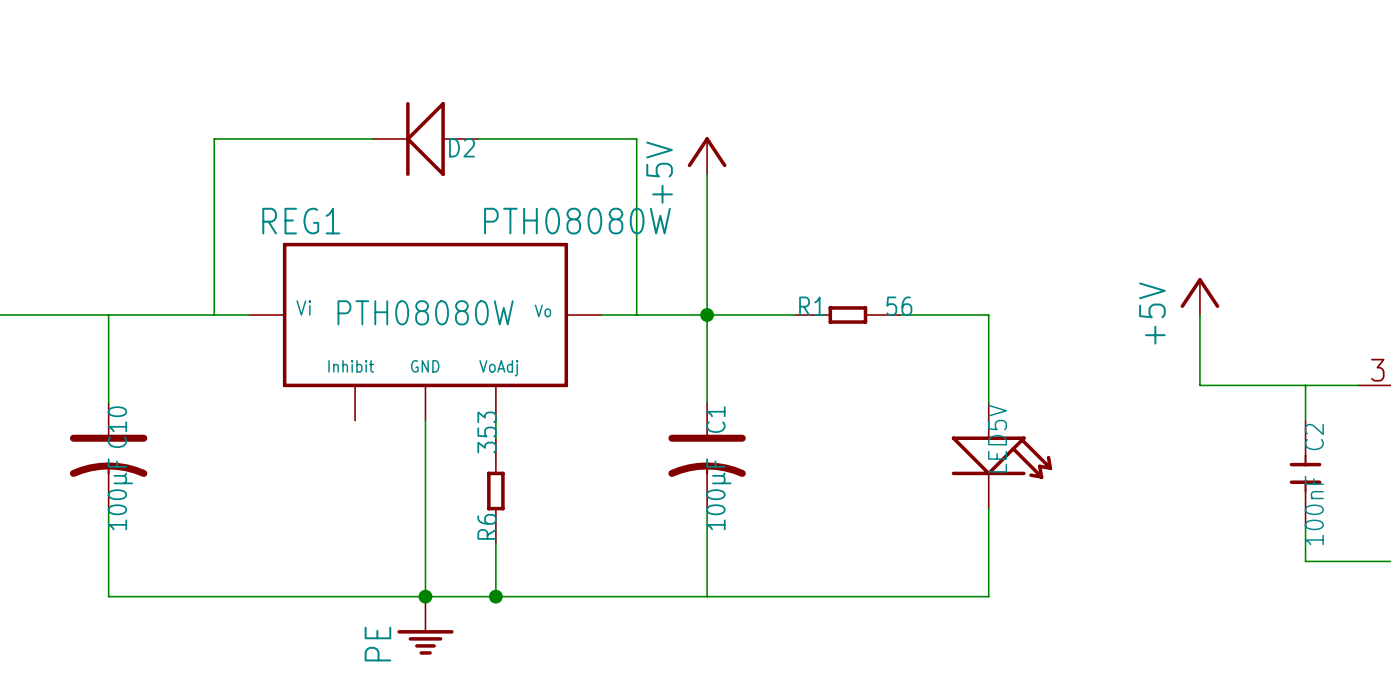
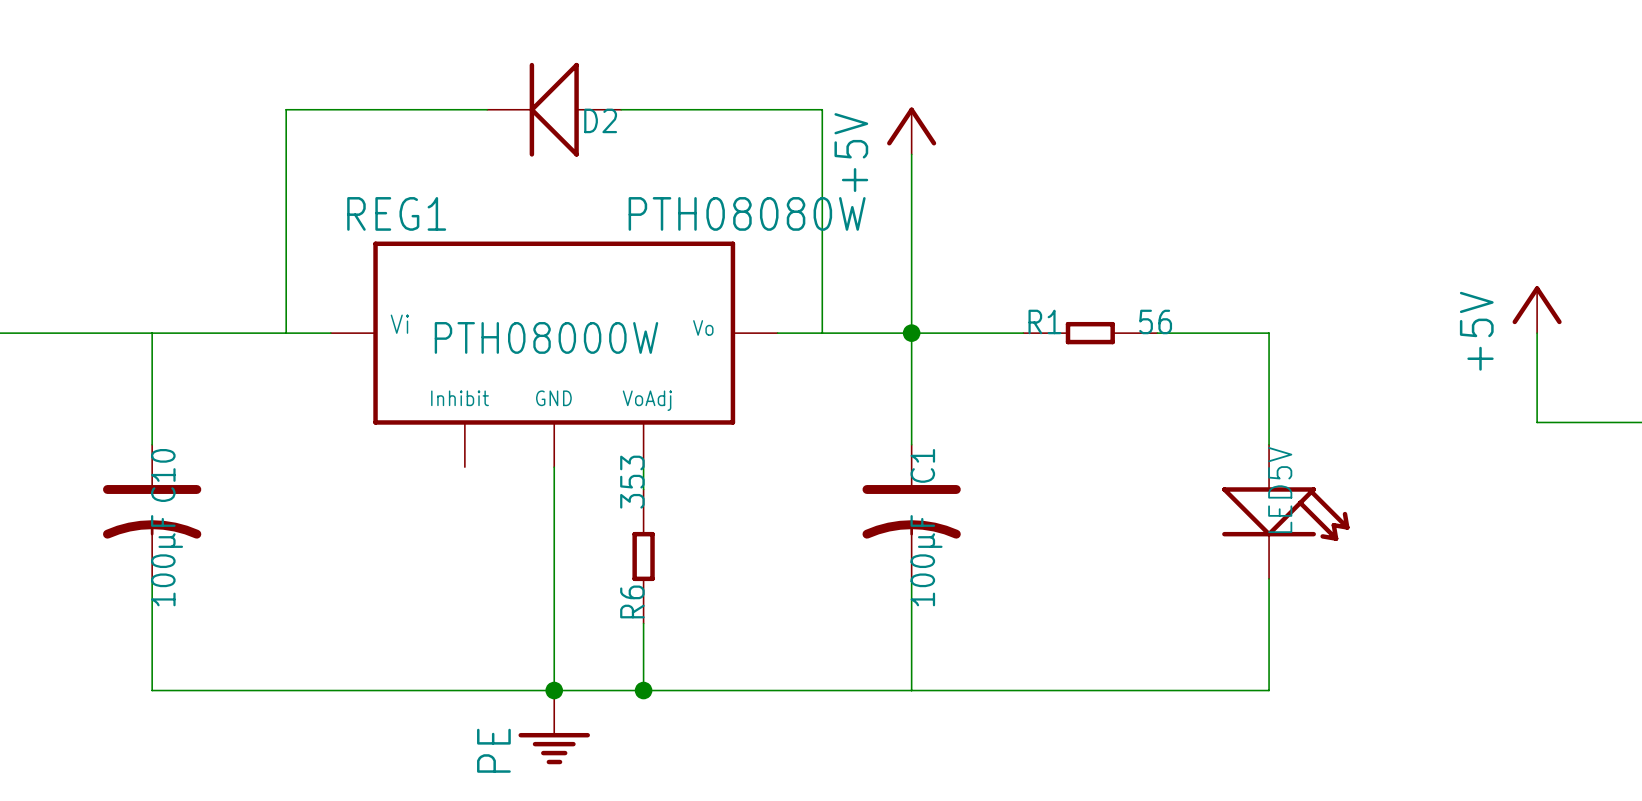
REG1 text: PTH08080W (425, 312) -> none
REG1 text: none -> PTH08000W (546, 337)

